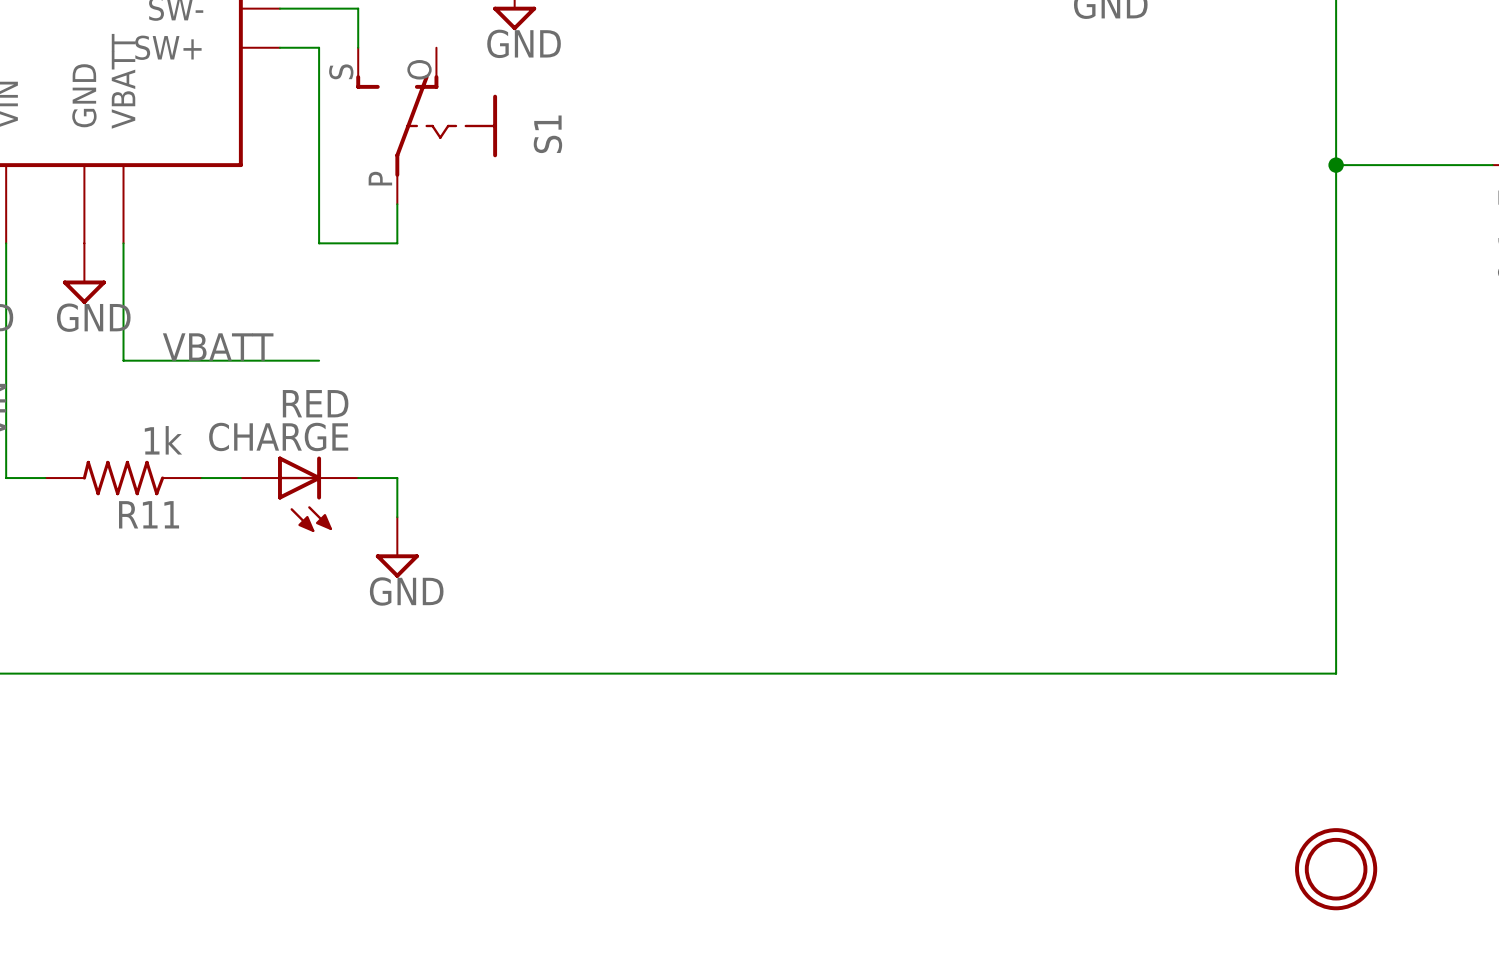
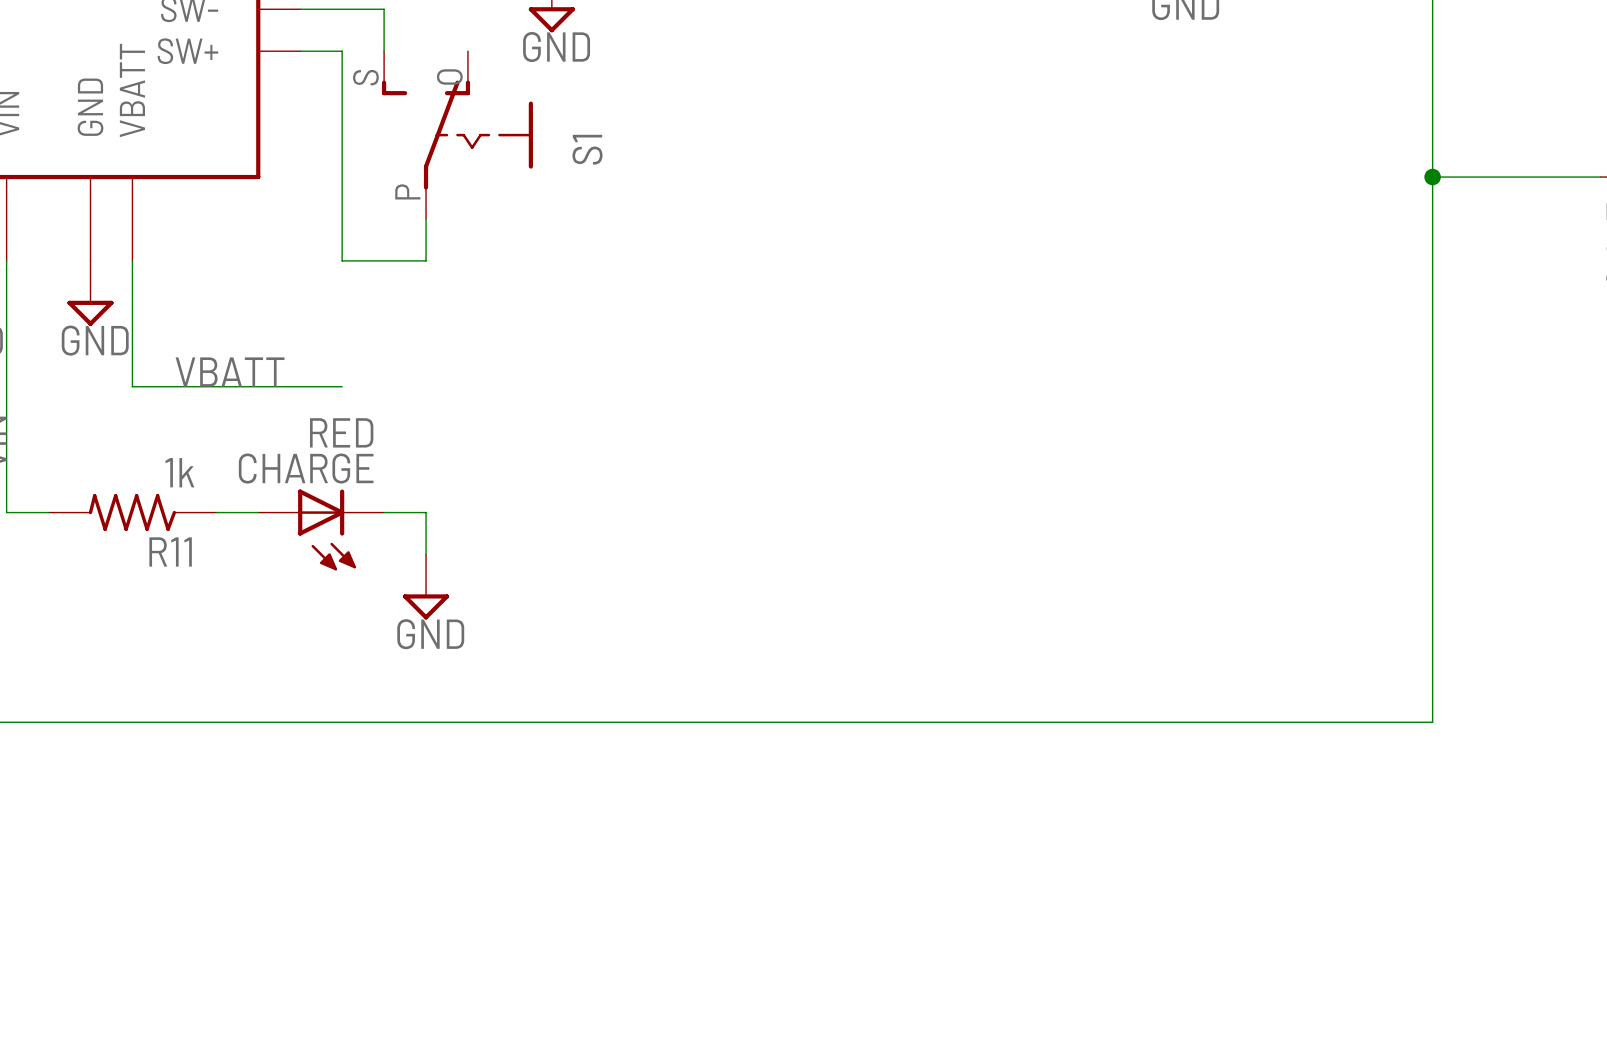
part: (1336, 869) -> none

